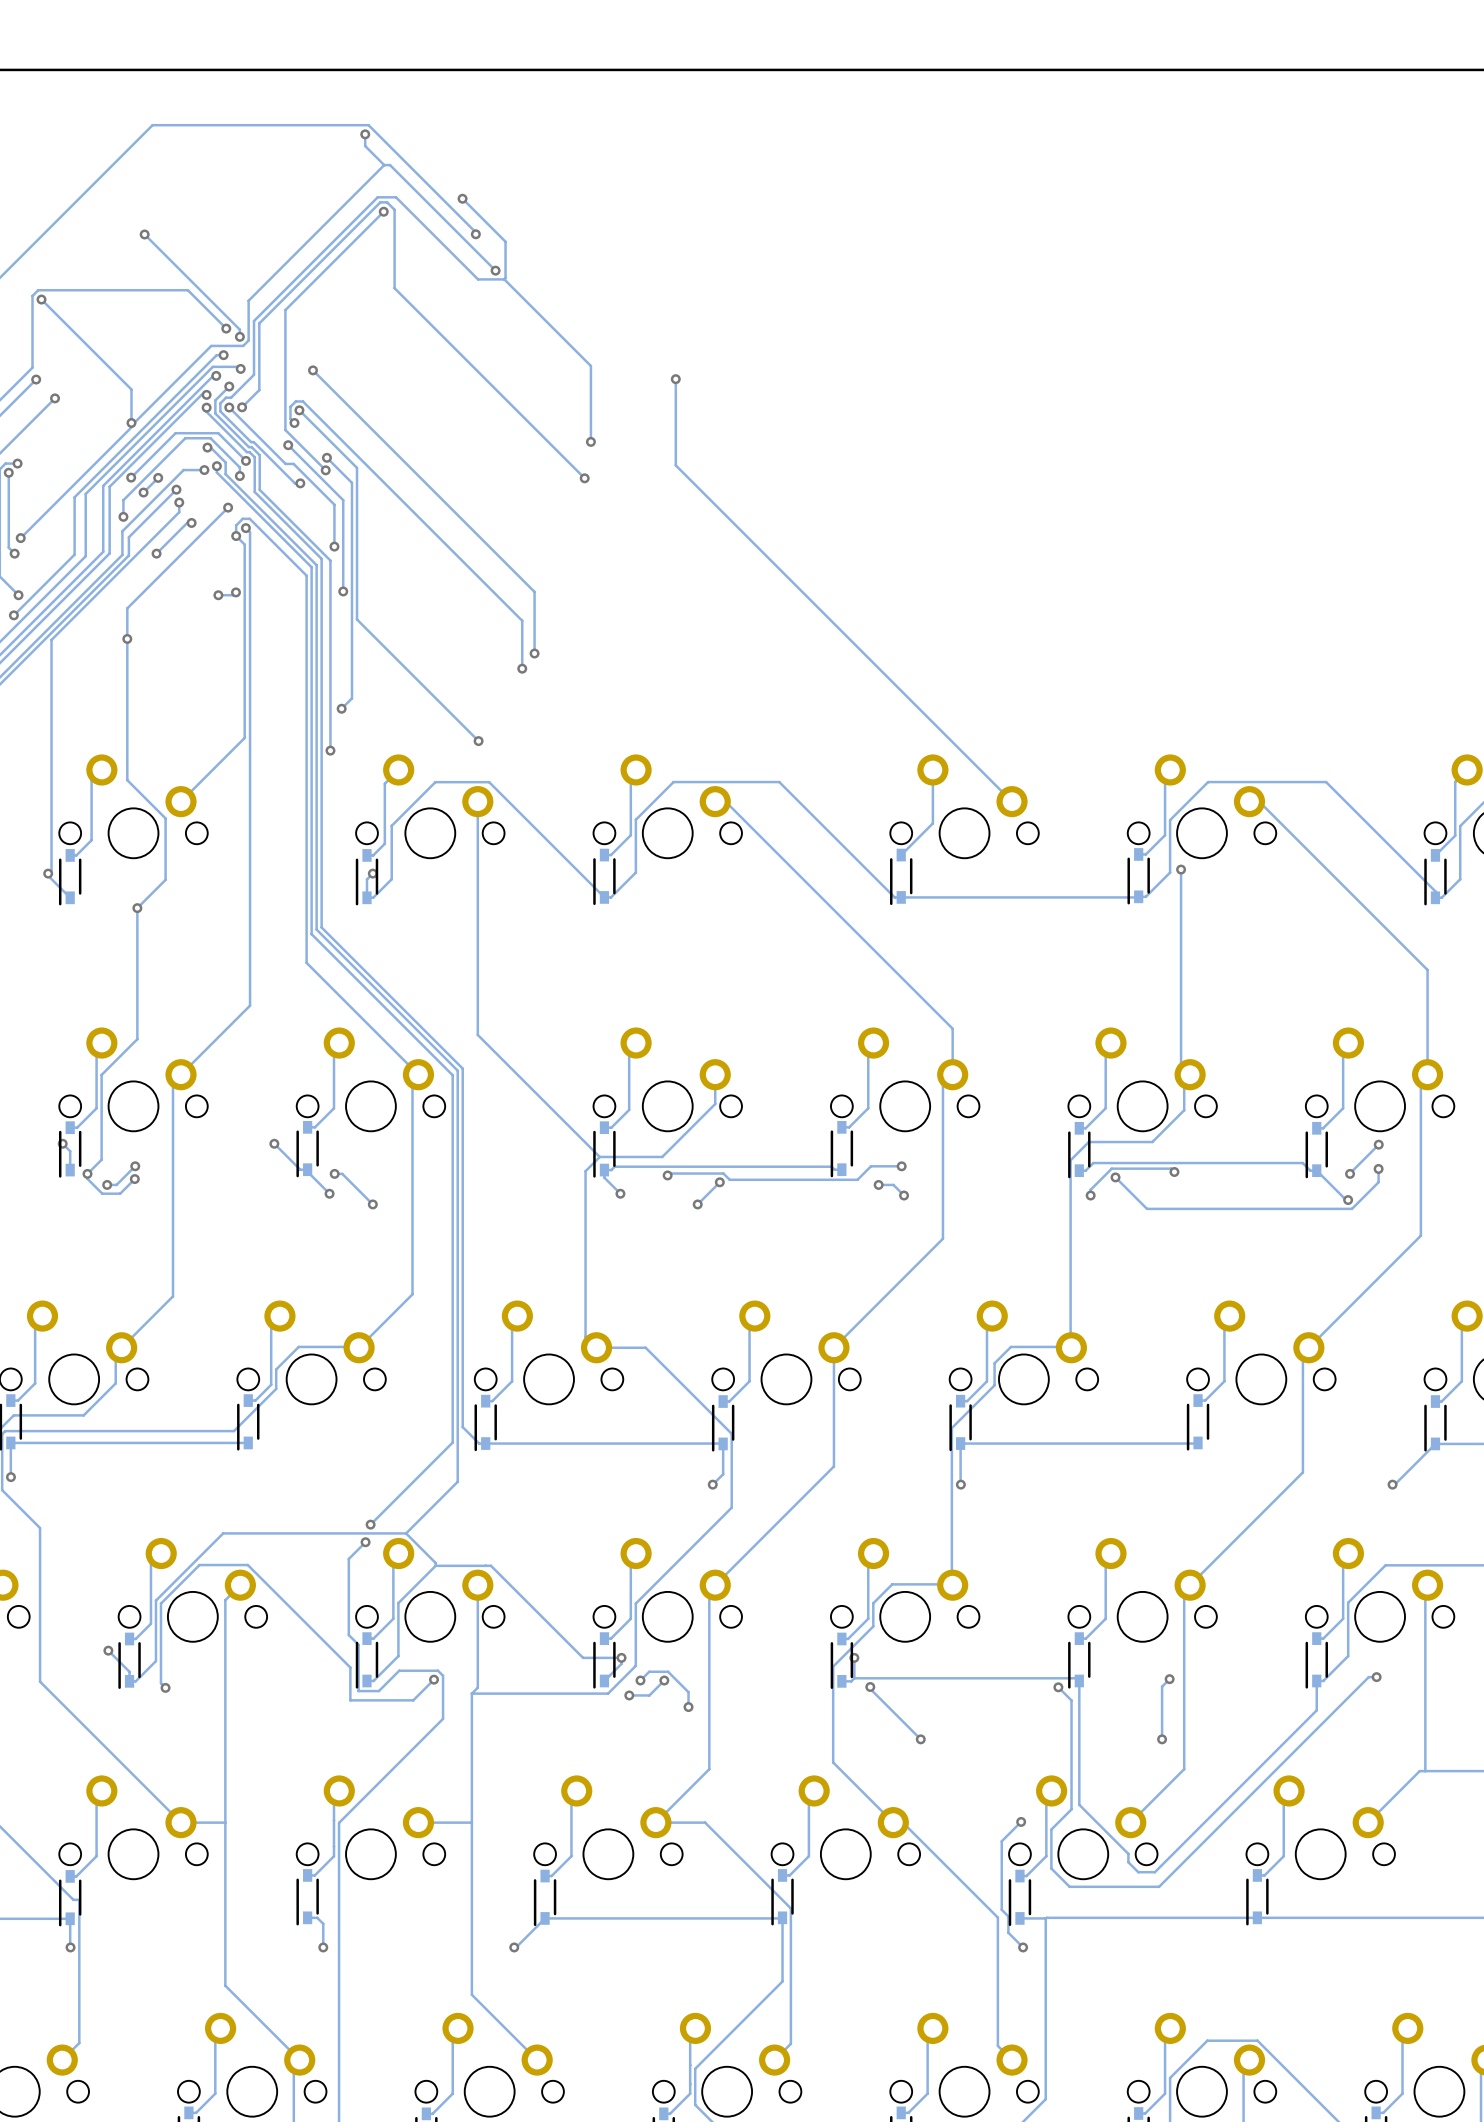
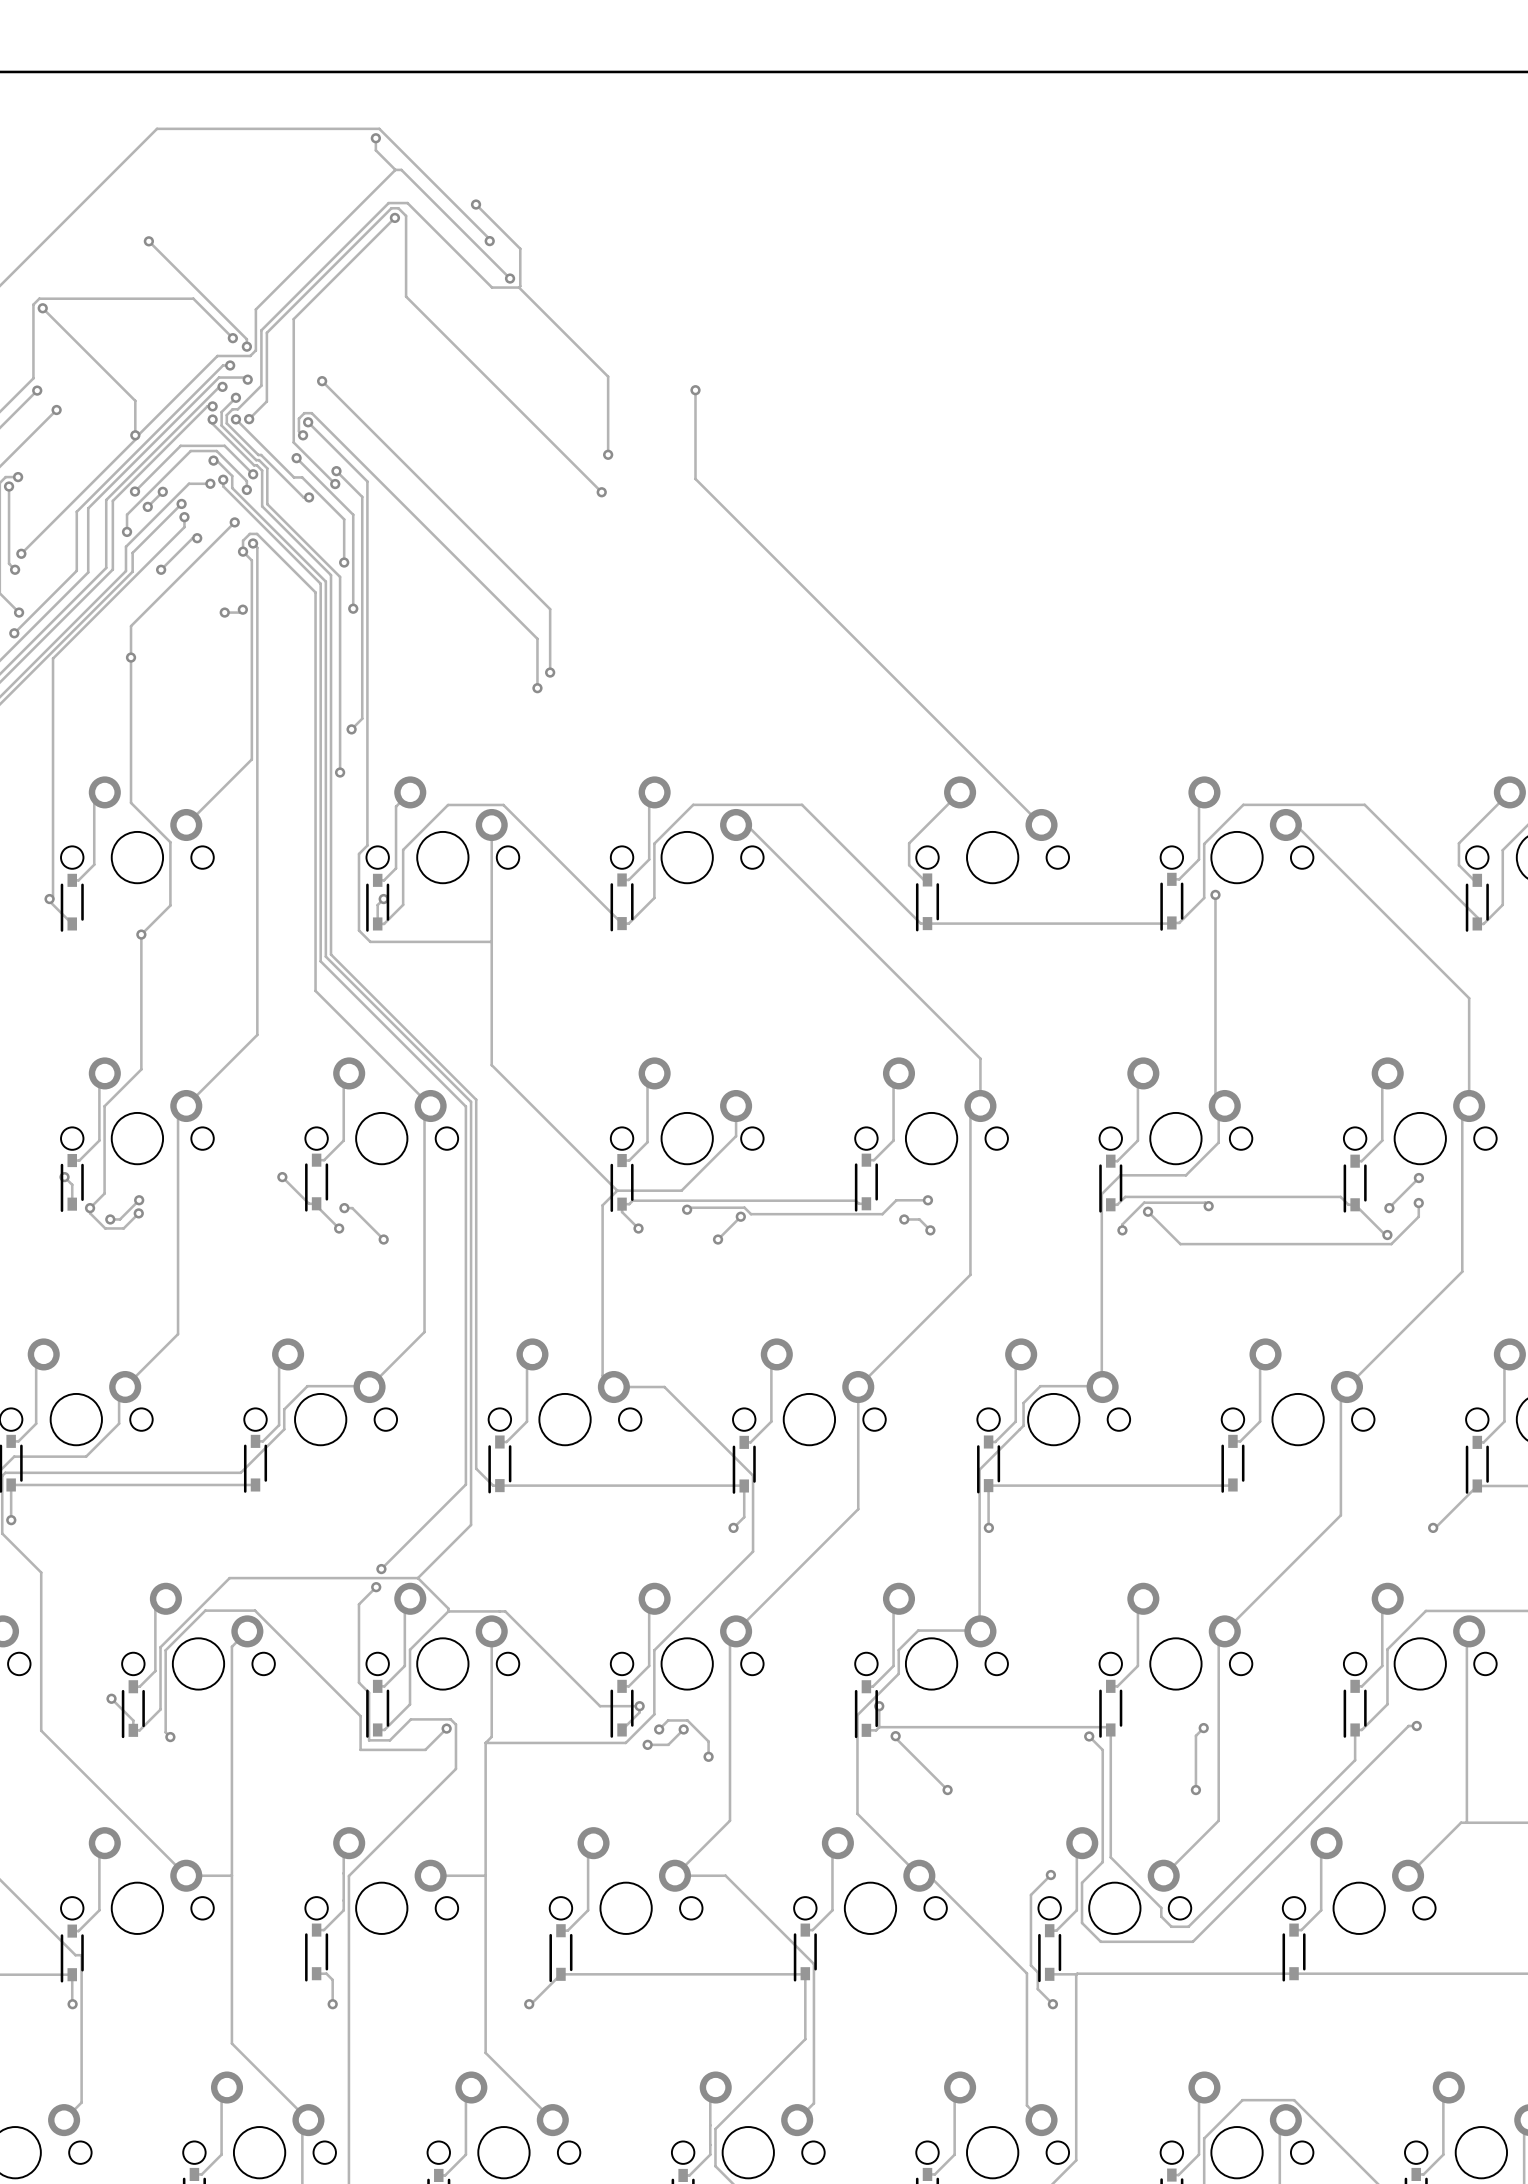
track: (357, 619) (478, 741) -> (367, 637) (367, 845) (359, 853) (359, 930) (370, 941) (490, 941)
via: (478, 741) -> none
track: (932, 769) (932, 823) (901, 855) -> (960, 792) (909, 843) (909, 865) (923, 879) (927, 879)
track: (1455, 781) (1455, 835) (1435, 855) -> (1497, 804) (1458, 843) (1458, 865) (1474, 880) (1477, 880)

